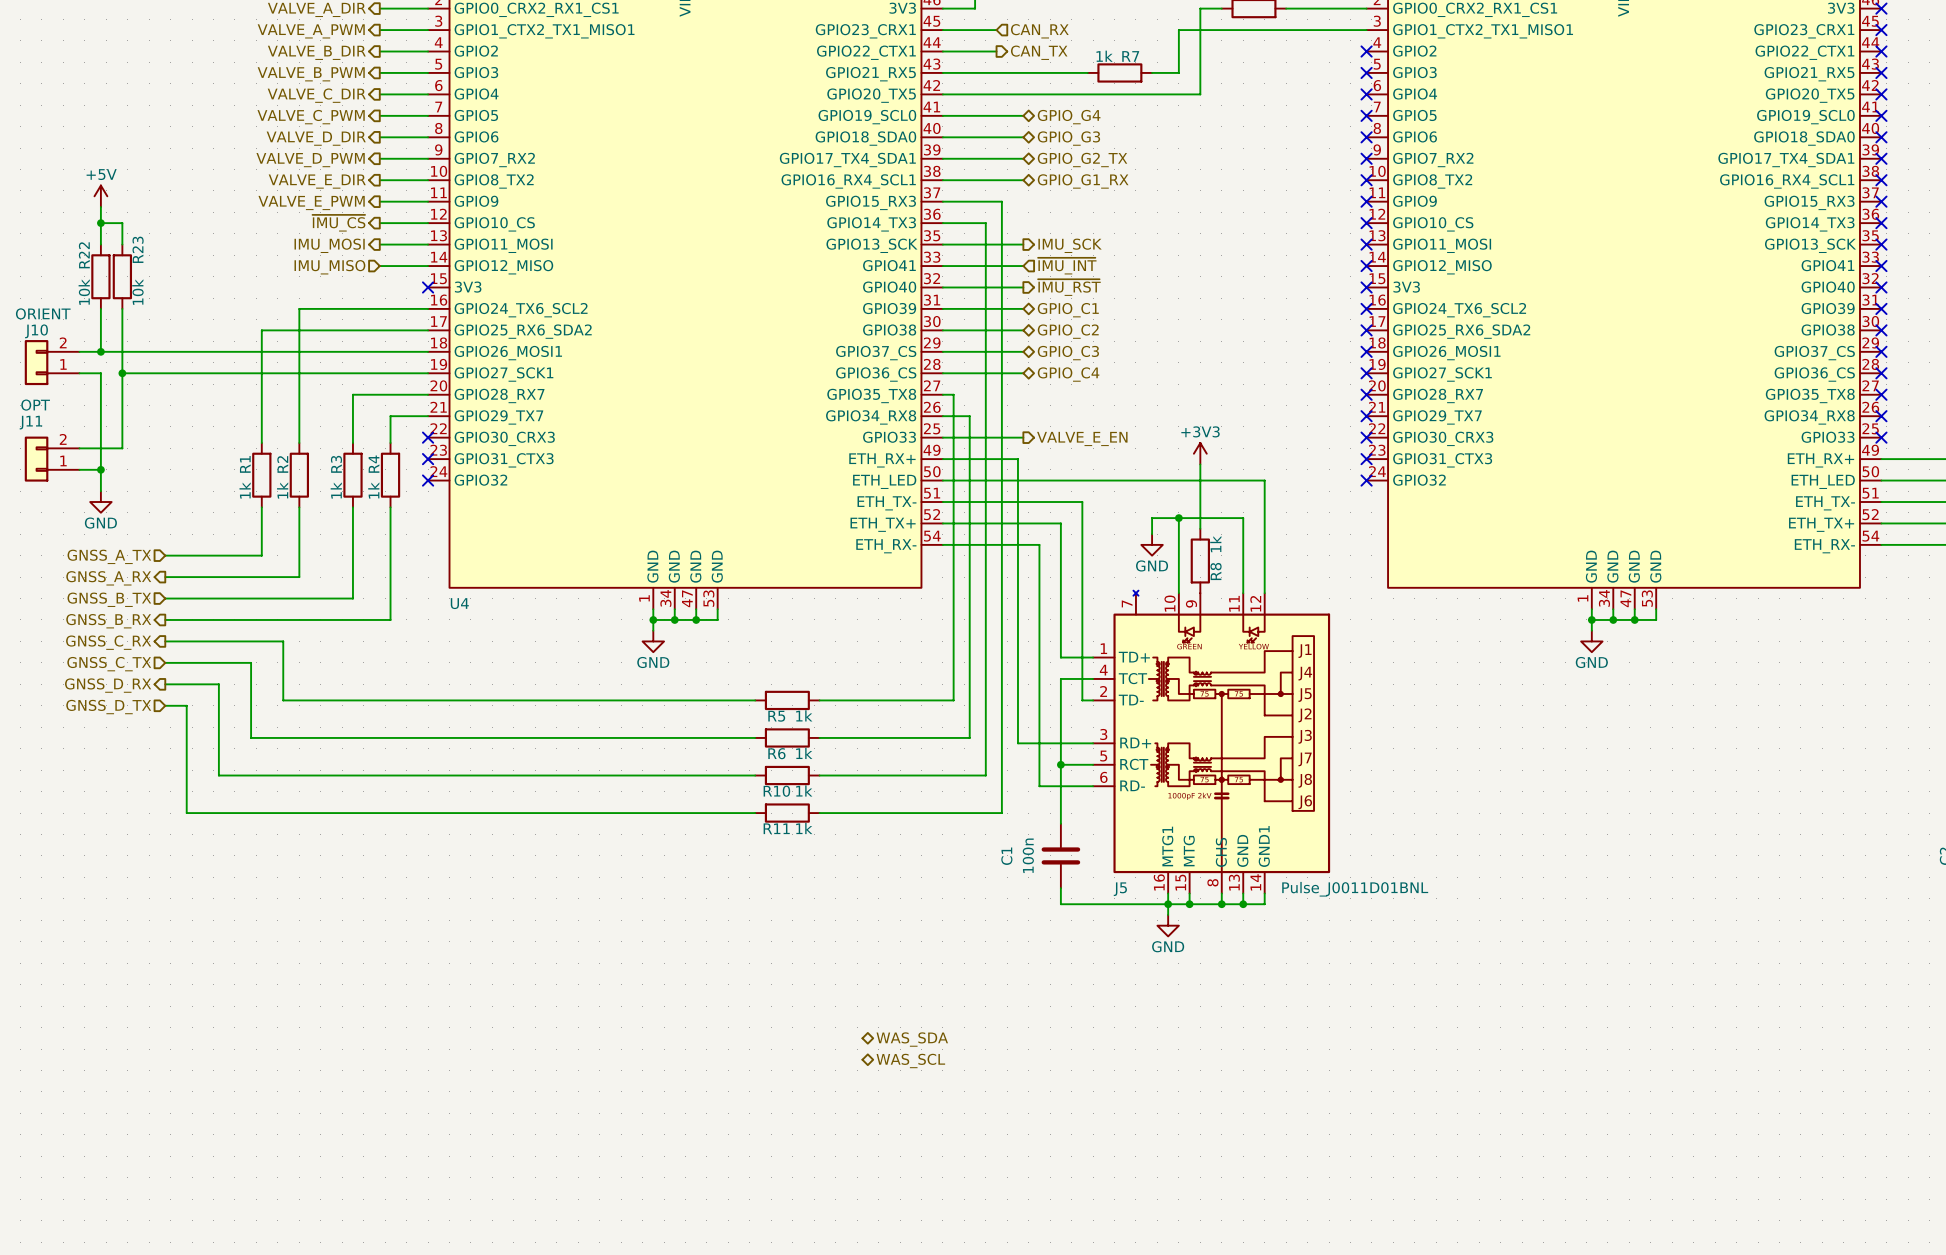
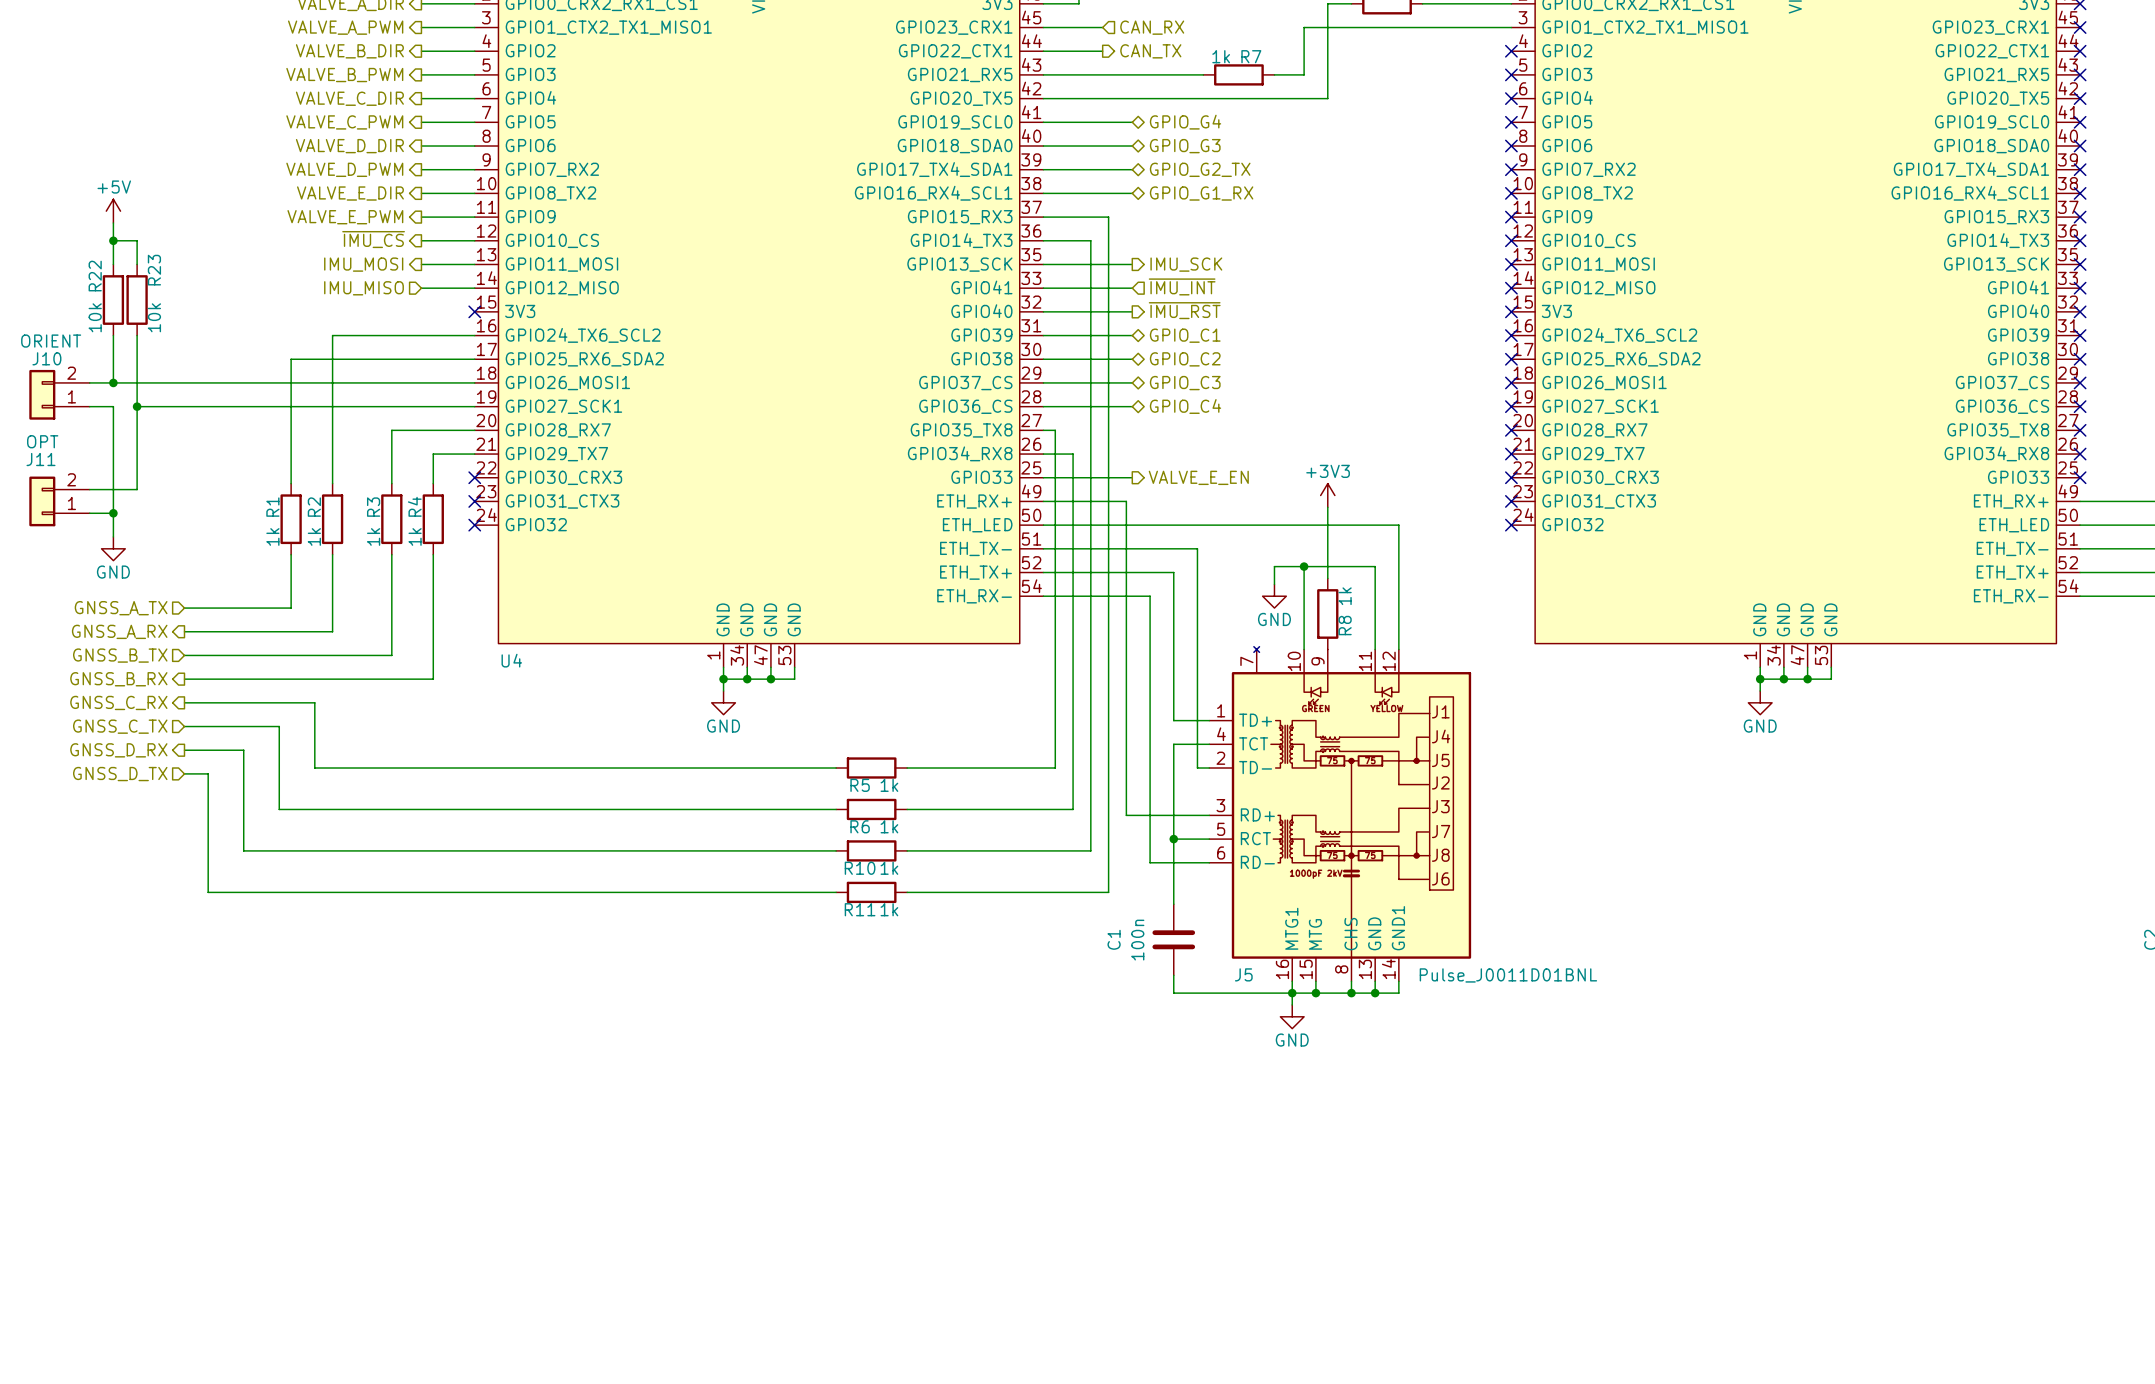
hierarchical label: WAS_SDA (912, 1039) -> none
hierarchical label: WAS_SCL (910, 1060) -> none

